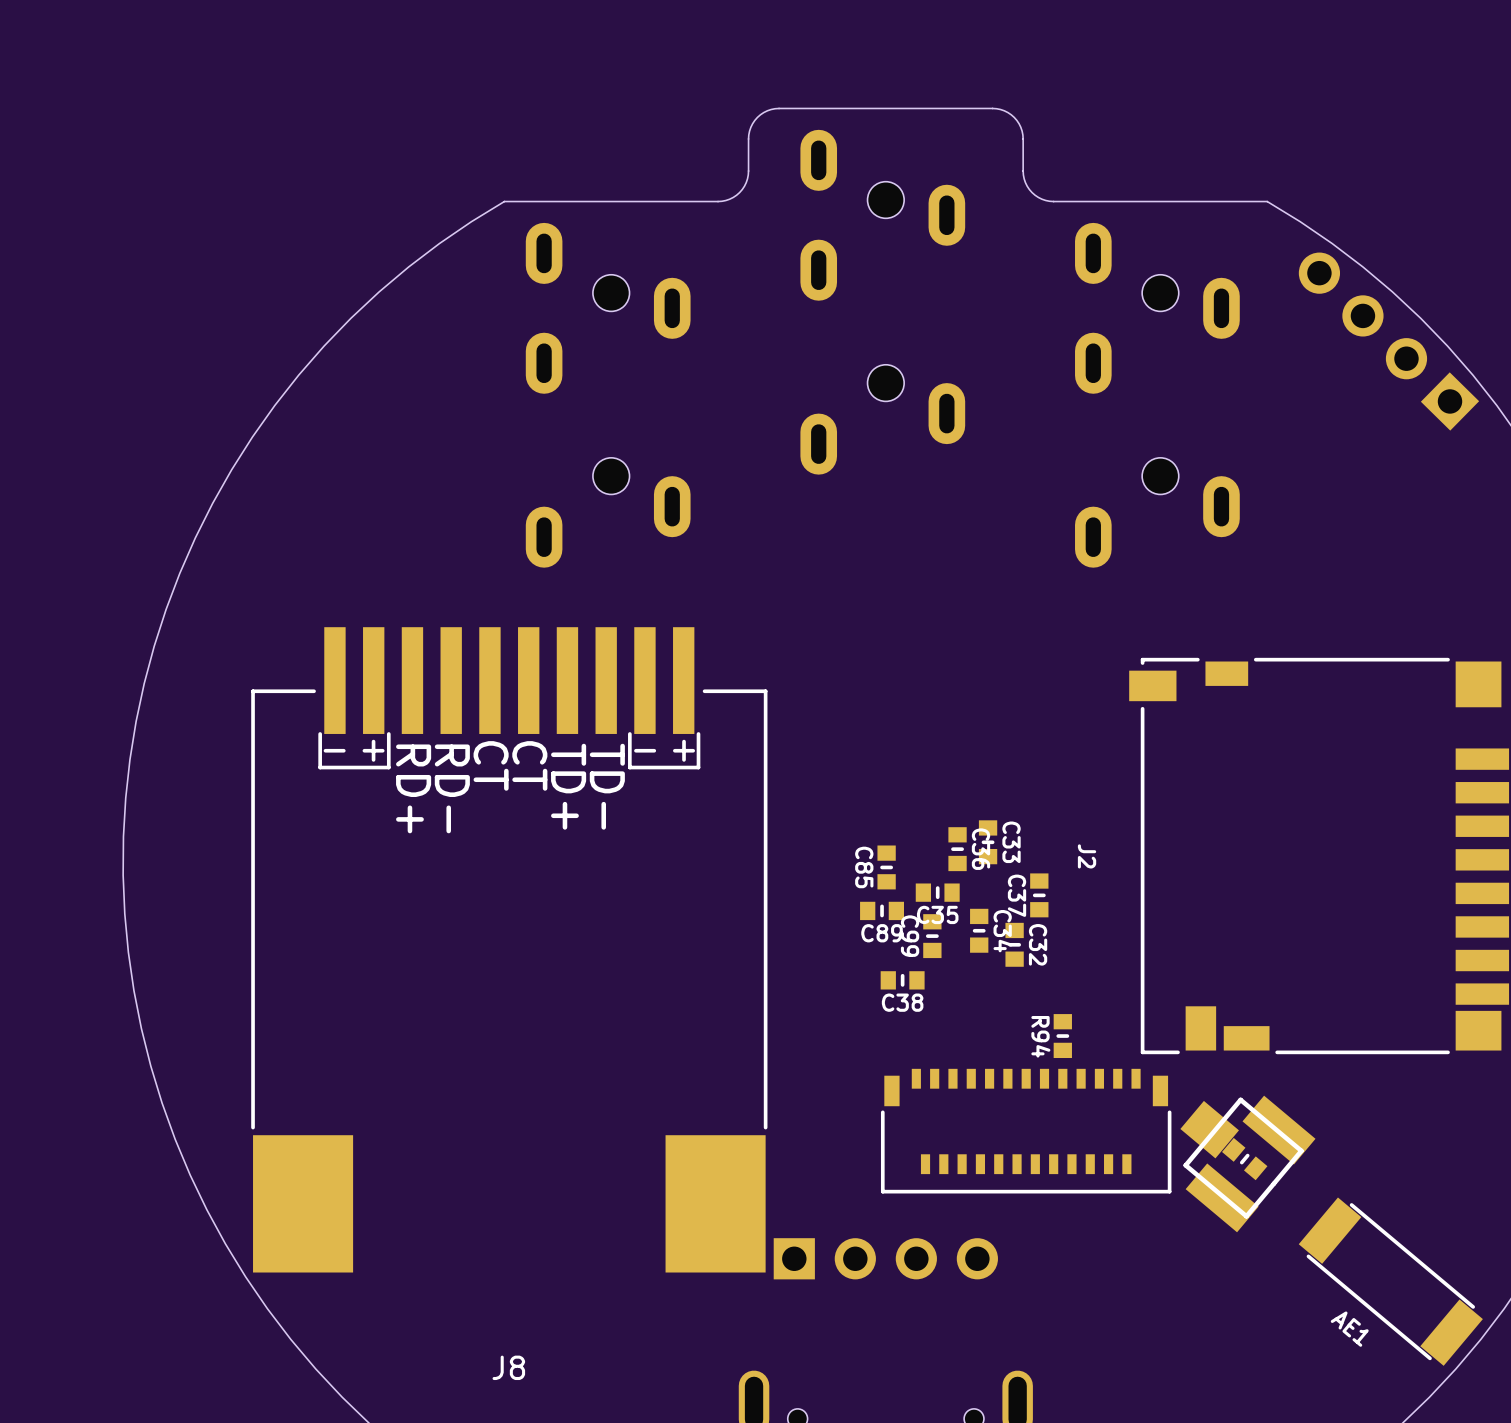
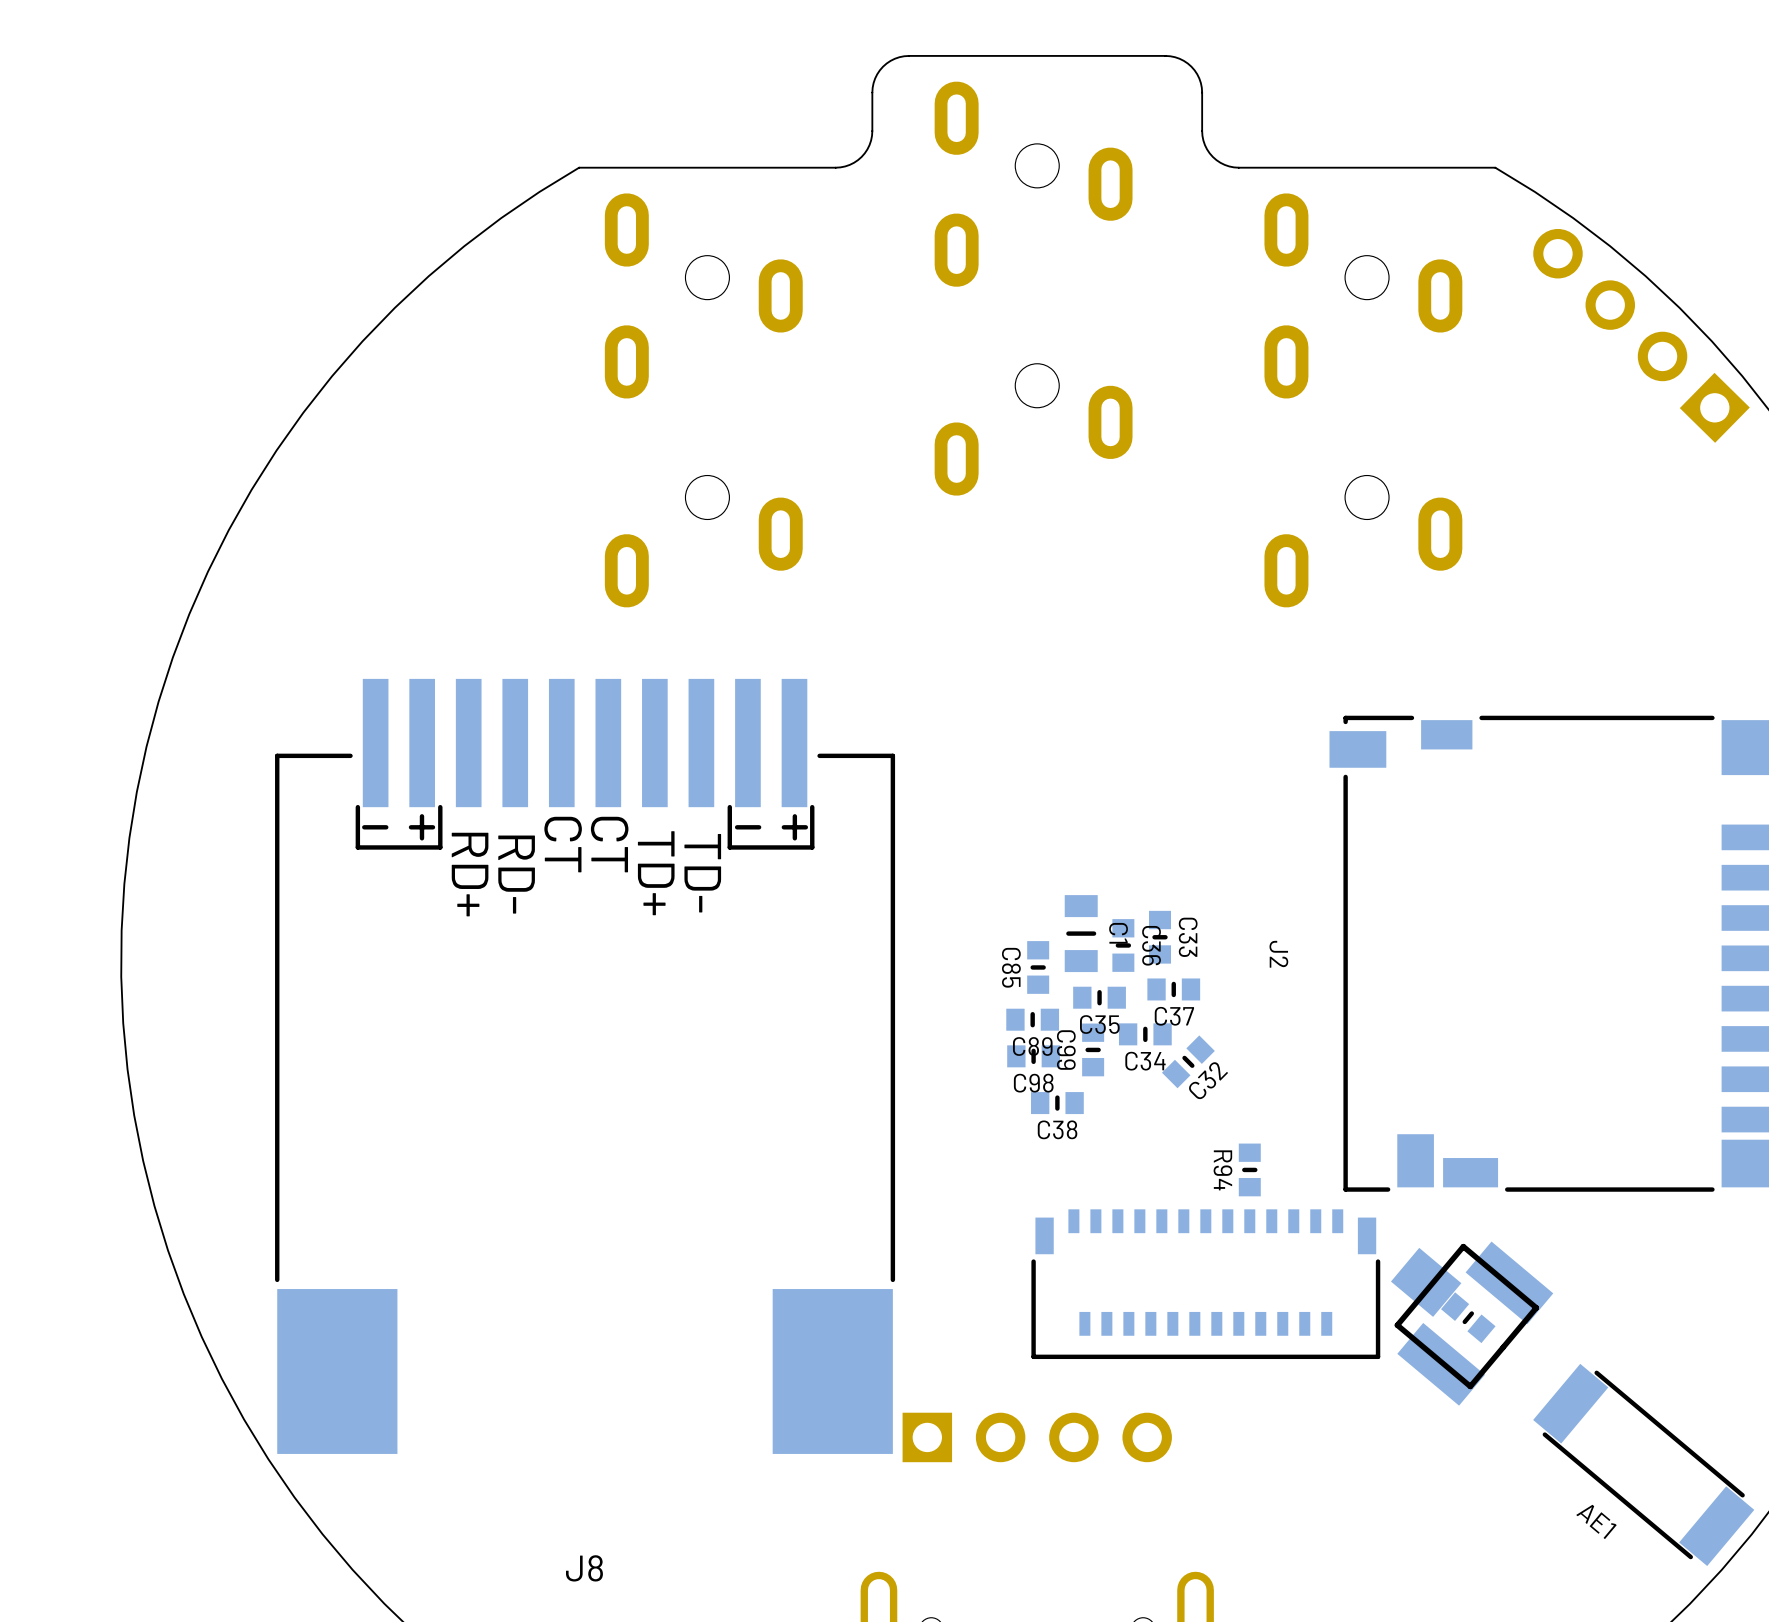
C1: none -> (1081, 933)
C37 rotation: 0° (1039, 895) -> 90° clockwise (1173, 989)
C37 position: (1039, 895) -> (1173, 989)
C34 rotation: 0° (979, 930) -> 90° clockwise (1145, 1034)
C98: none -> (1033, 1056)
C32 rotation: 0° (1014, 944) -> 45° clockwise (1188, 1061)

